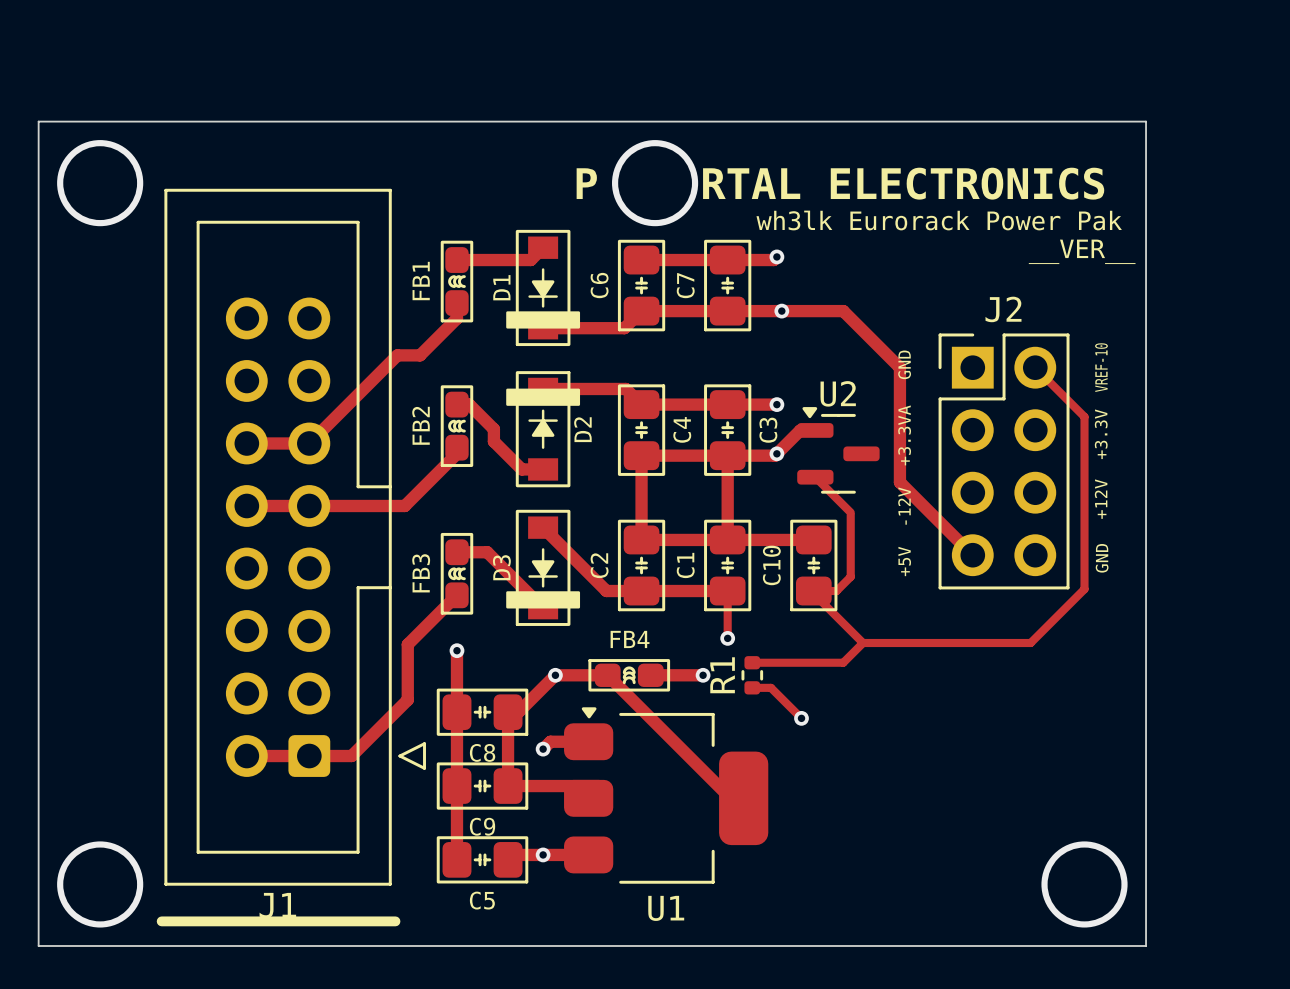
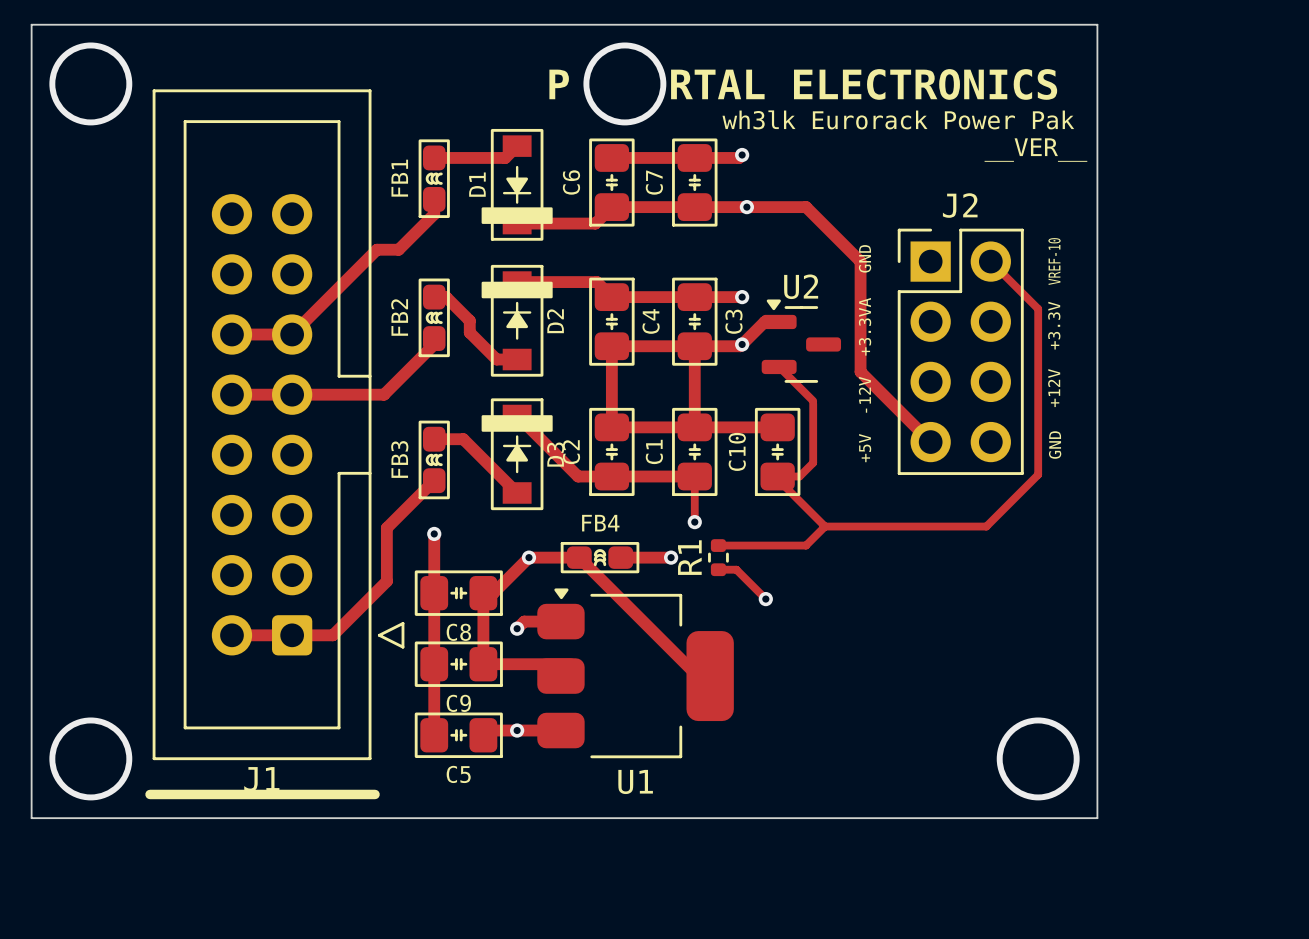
D3 rotation: 0° (543, 567) -> 180° (517, 454)

